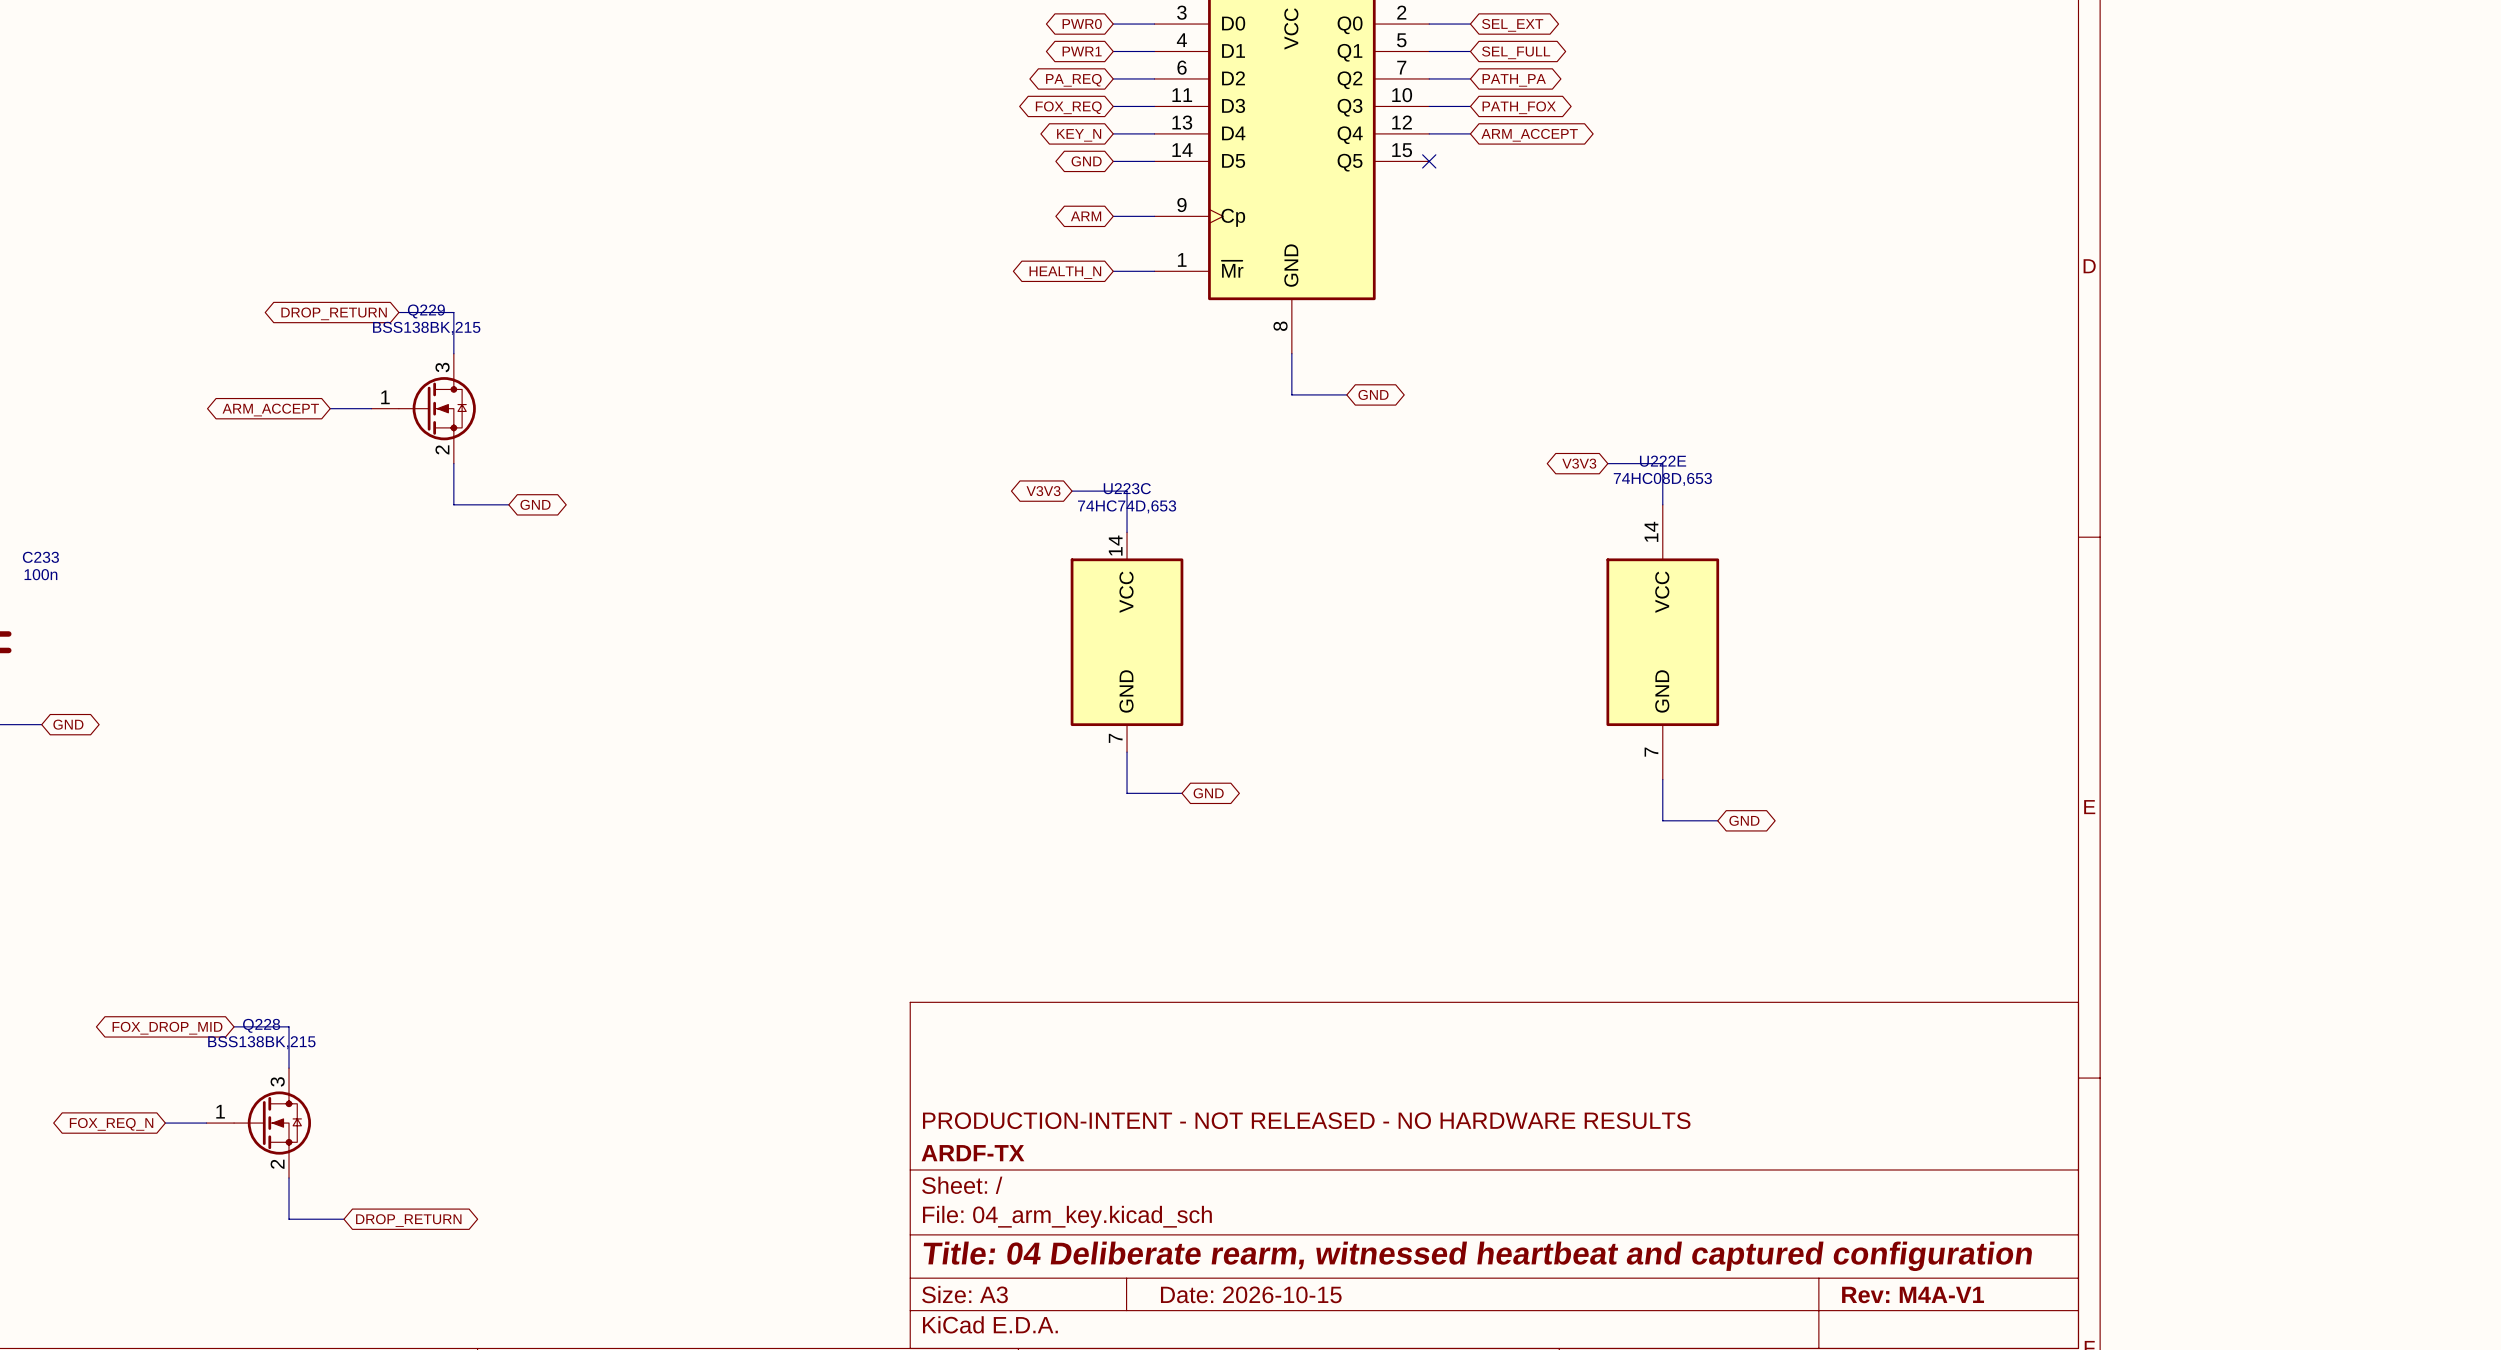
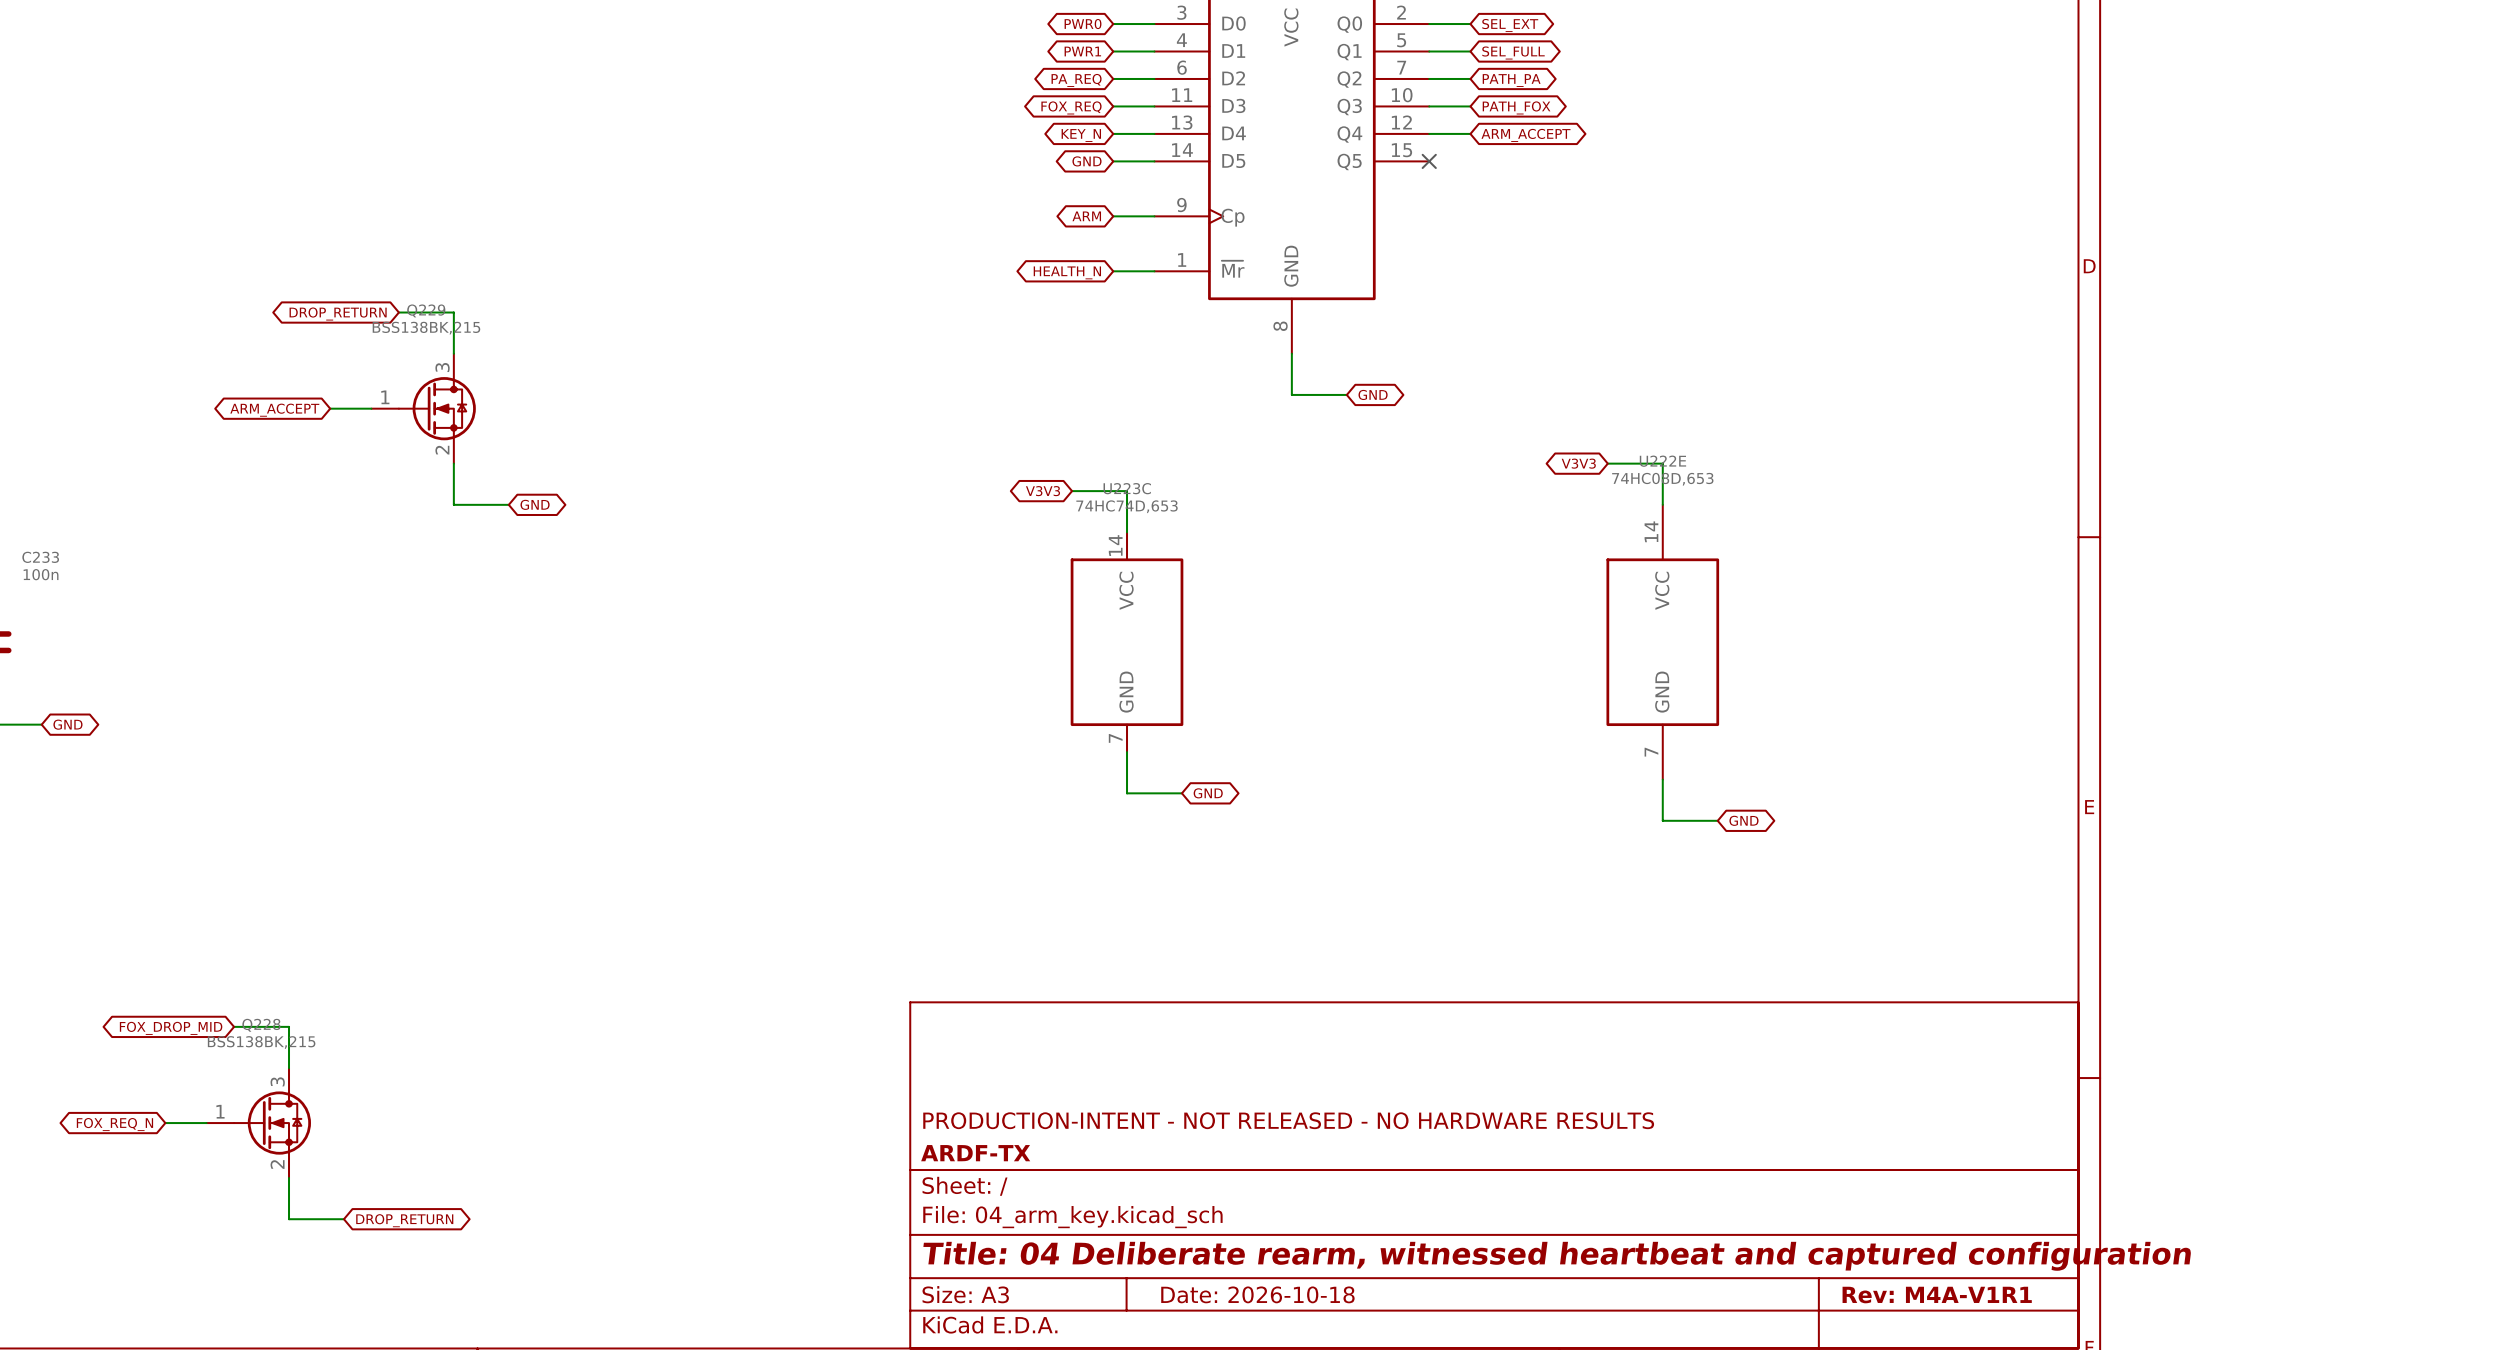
title block: Date: 2026-10-15 (1251, 1294) -> Date: 2026-10-18 (1257, 1294)
title block: Rev: M4A-V1 (1913, 1294) -> Rev: M4A-V1R1 (1937, 1295)

